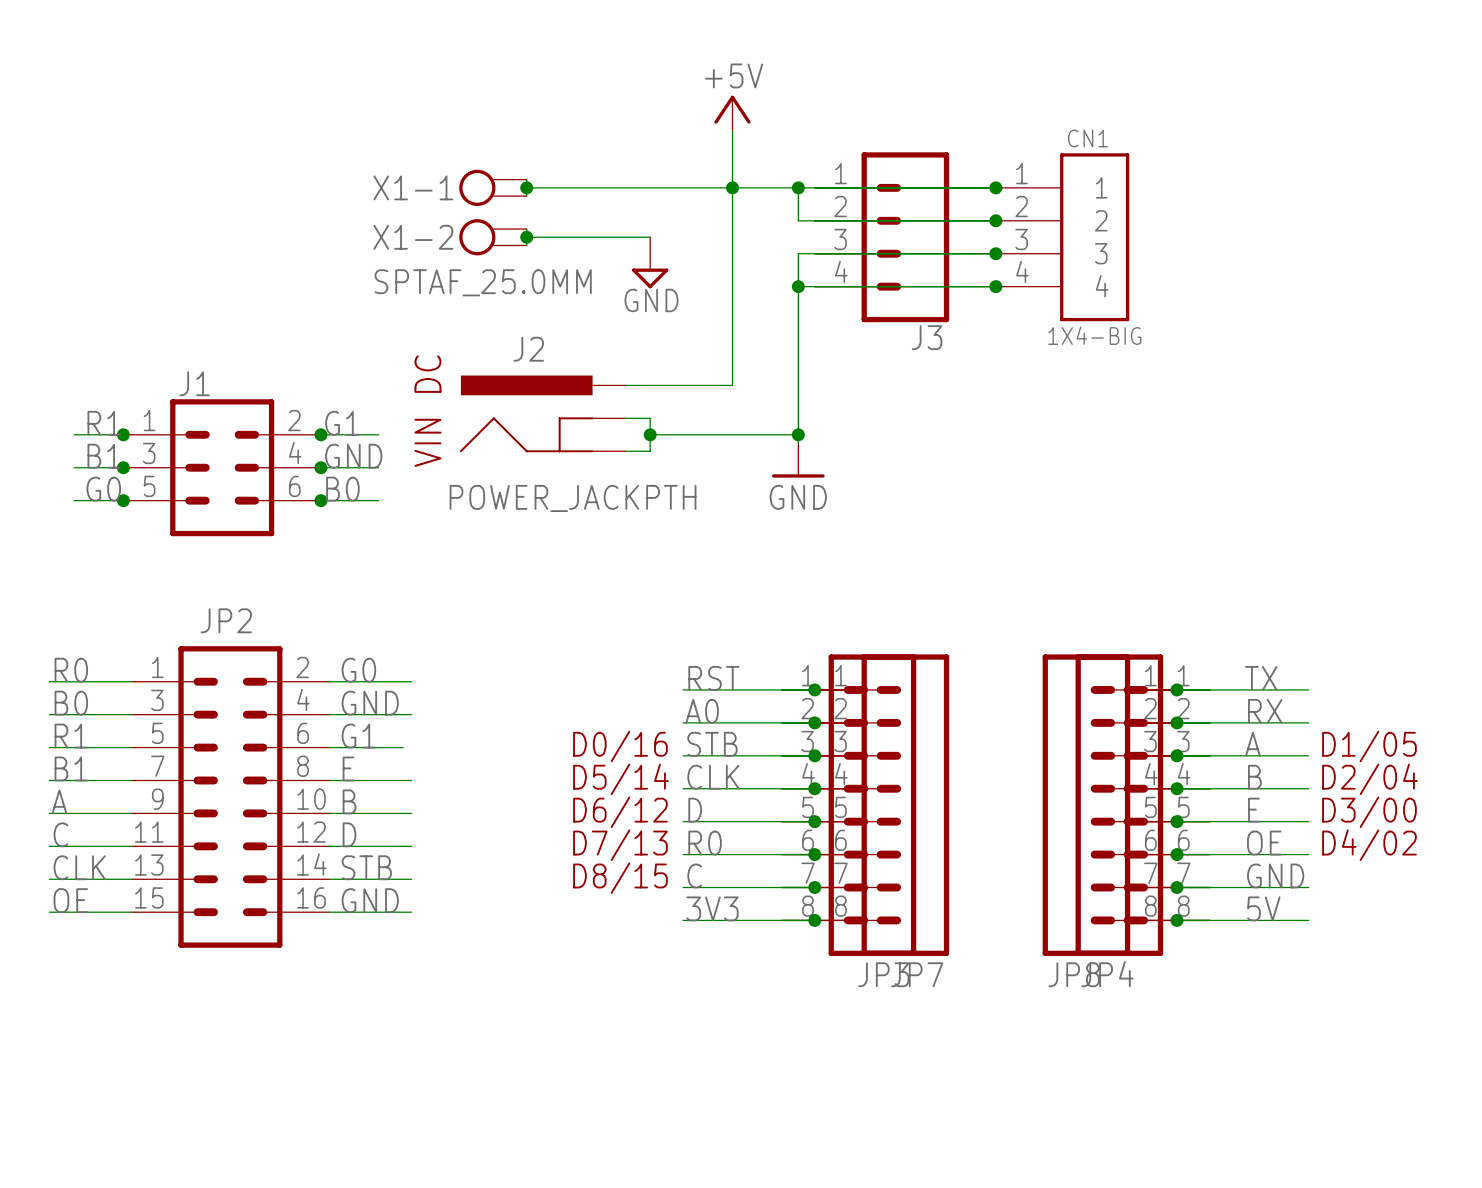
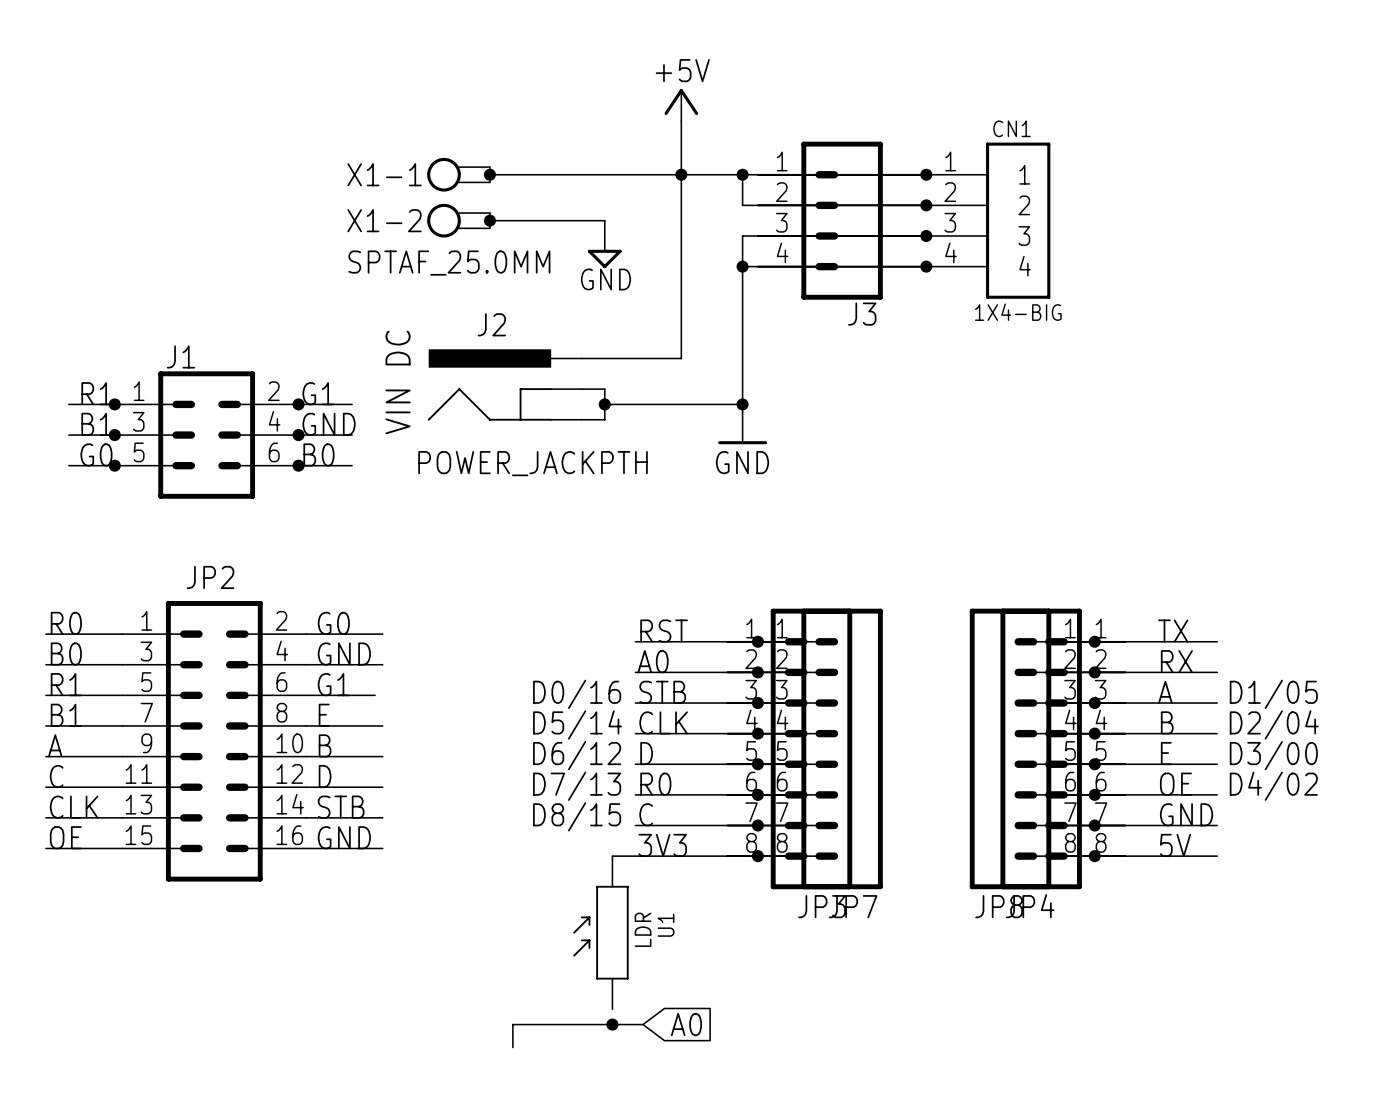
wire: none -> (612, 856) (635, 856)
U1: none -> LDR (600, 932)
junction: none -> (612, 1024)
wire: none -> (643, 1024) (512, 1024) (512, 1047)
global label: none -> A0 (686, 1024)

